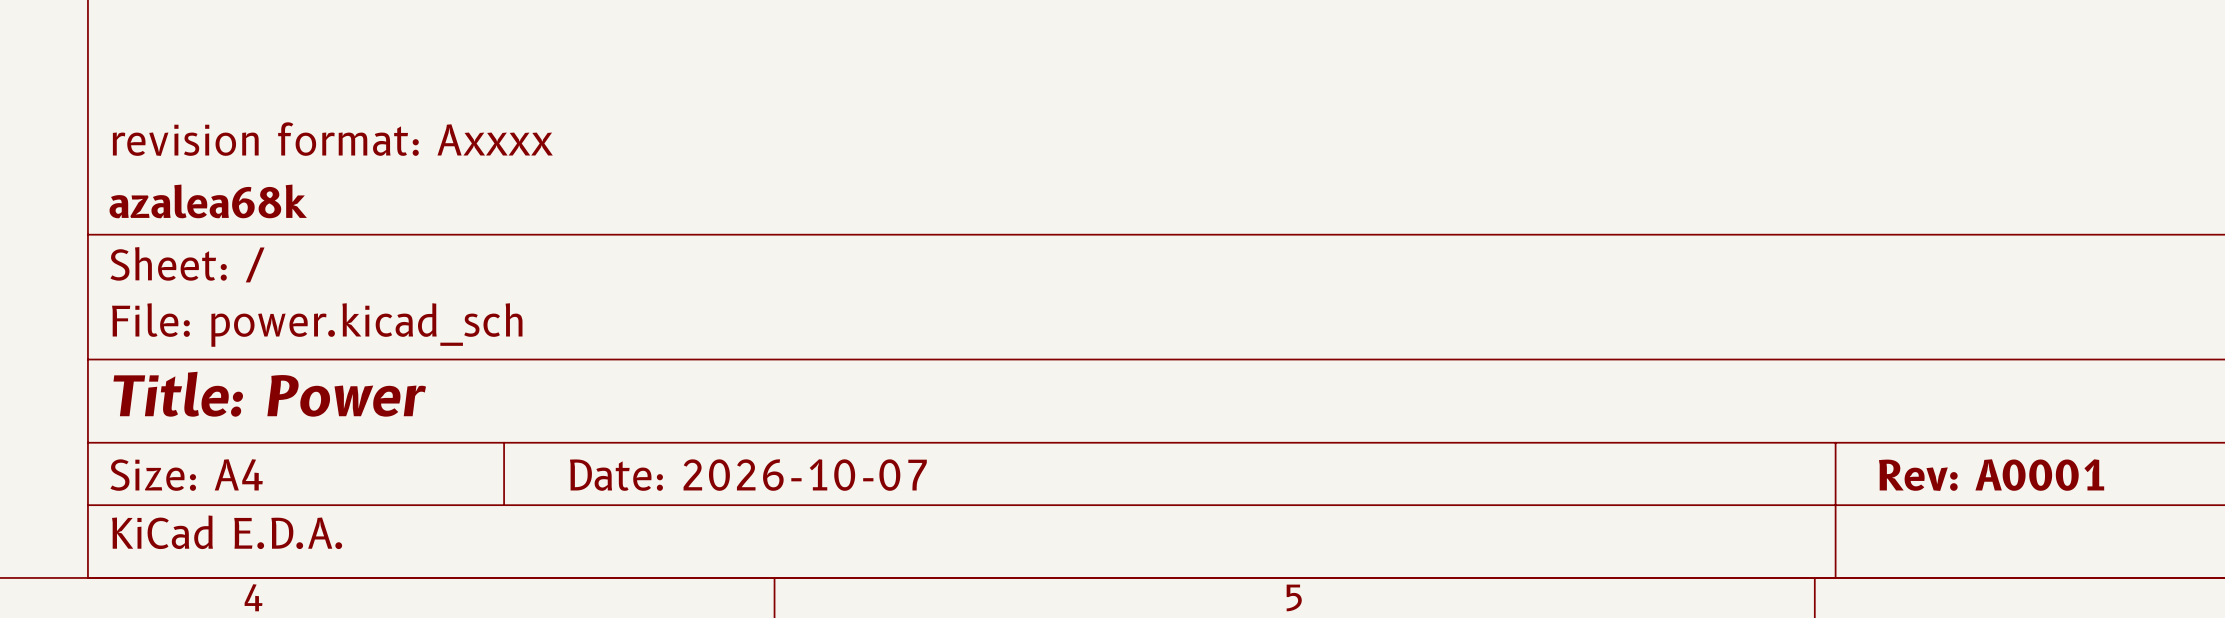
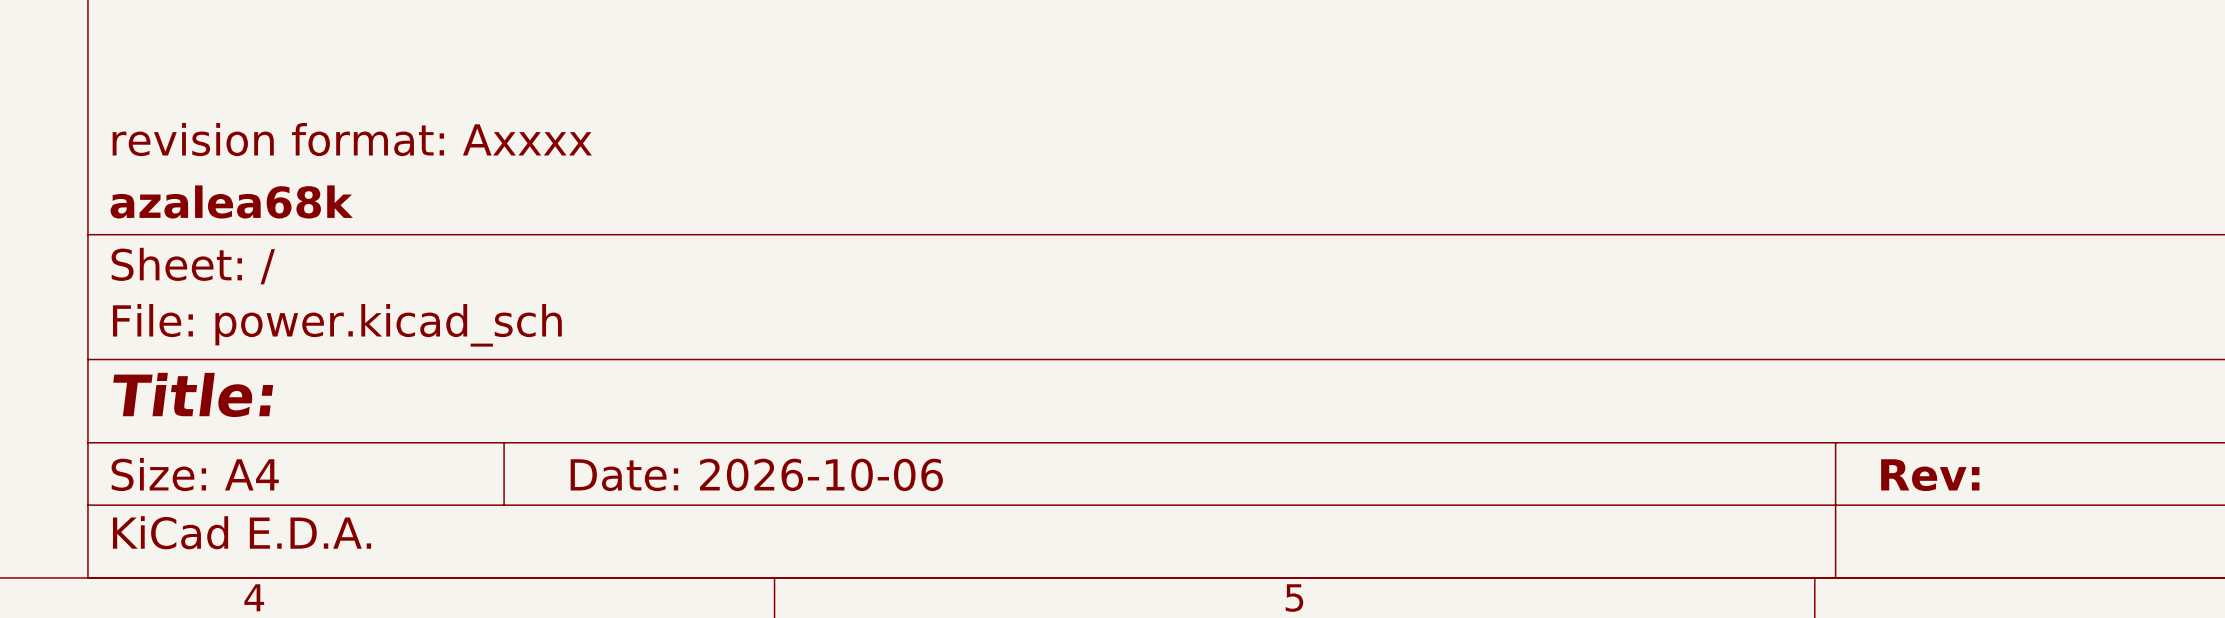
title block: Title: Power (269, 394) -> Title: (193, 394)
title block: Date: 2026-10-07 (748, 475) -> Date: 2026-10-06 (756, 474)
title block: Rev: A0001 (1991, 475) -> Rev: (1930, 475)

